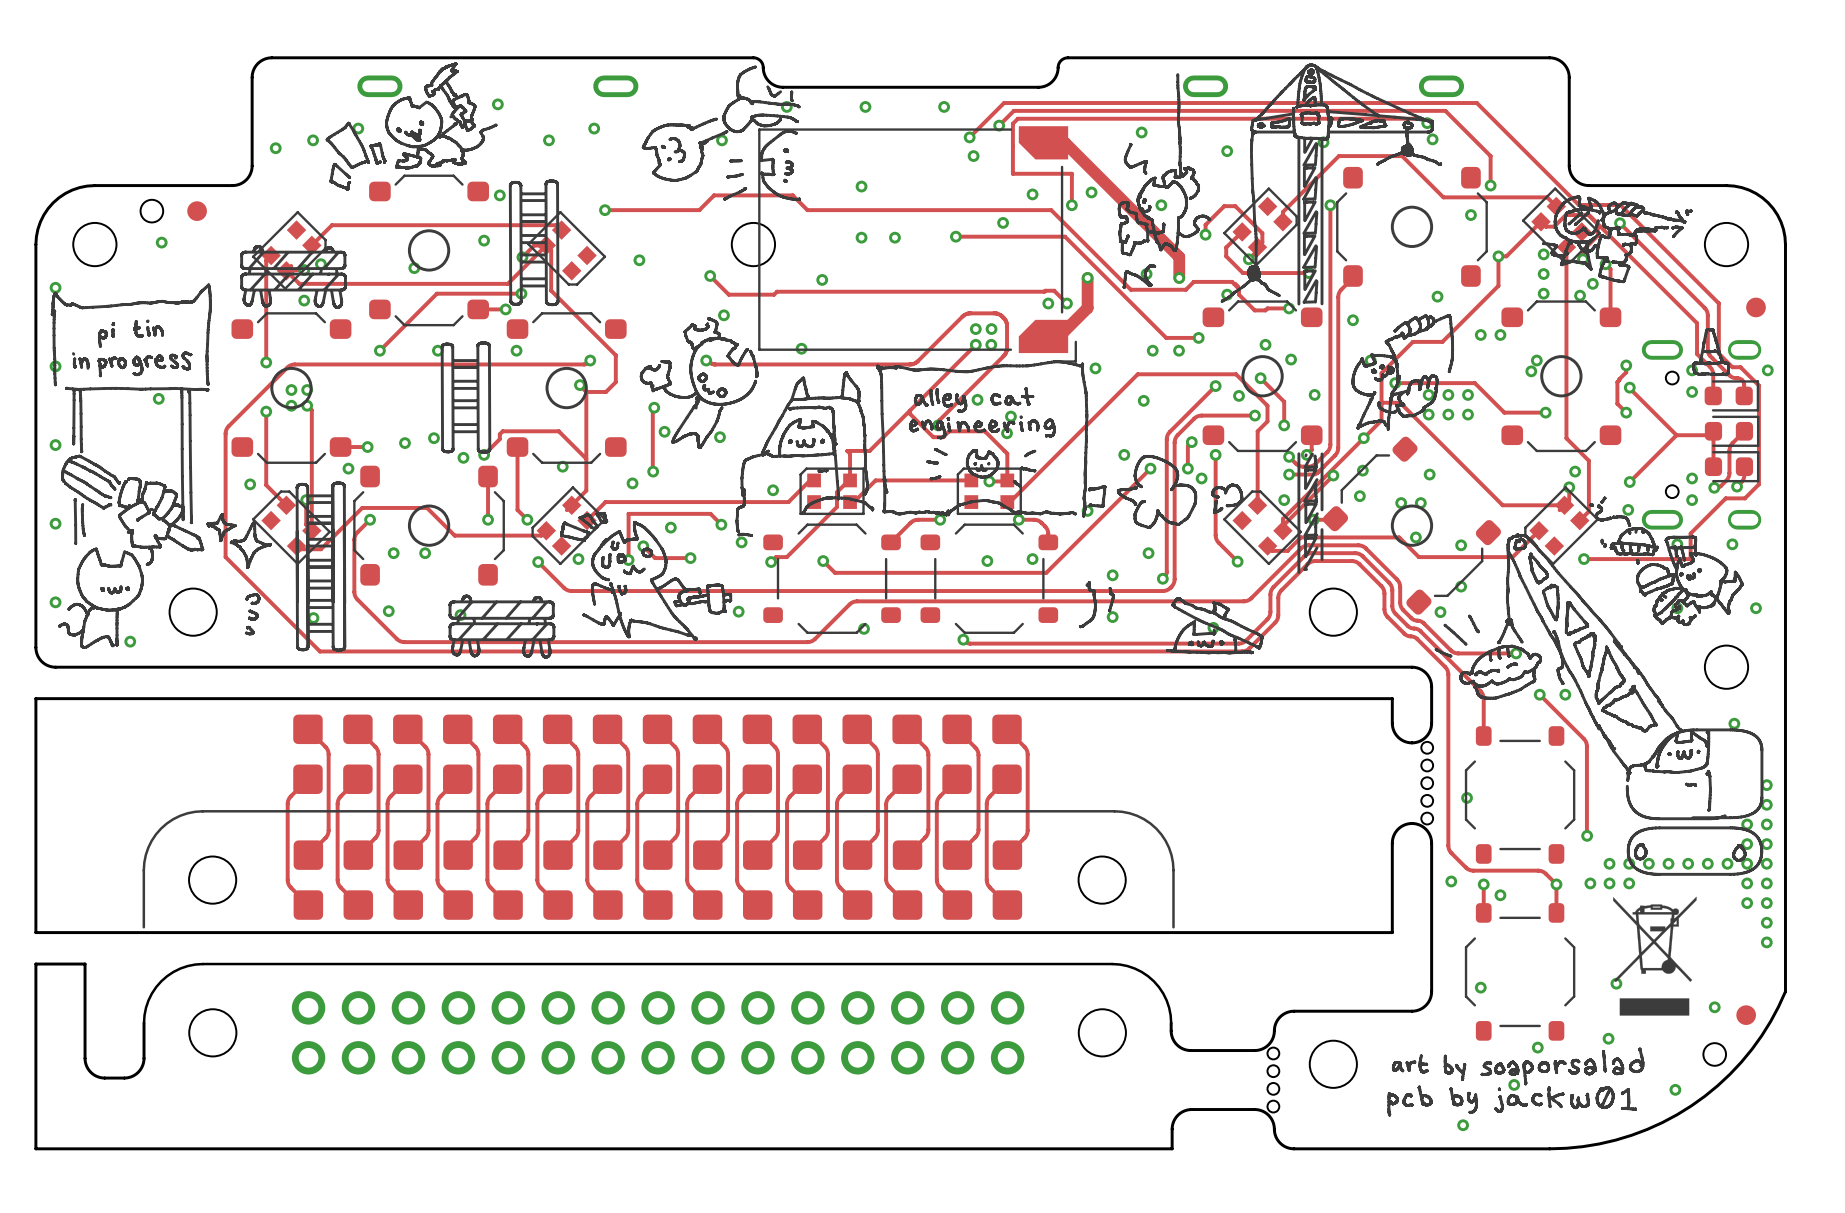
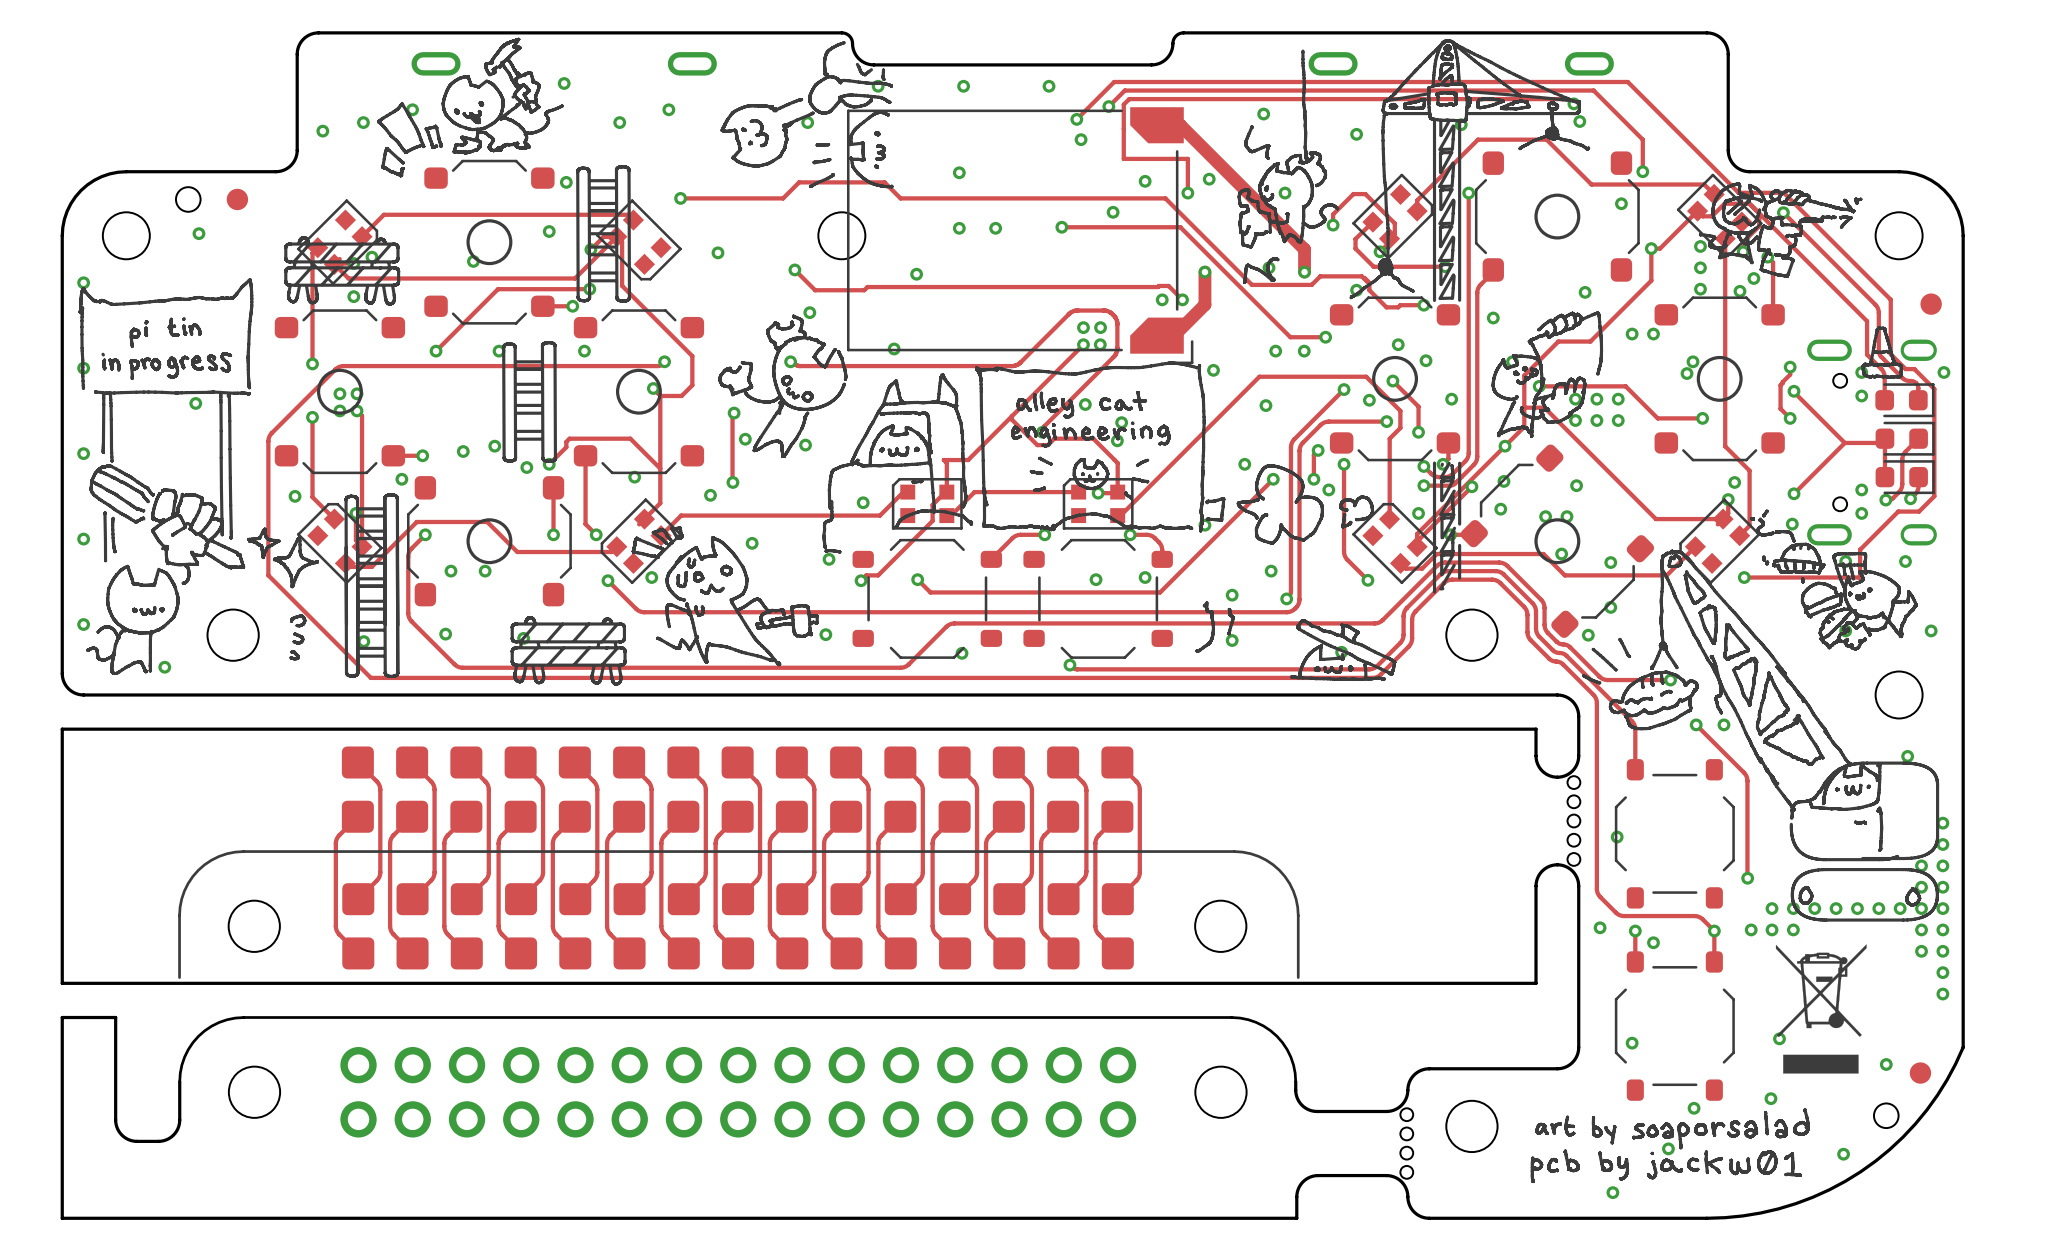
track: (721, 524) (710, 513) (628, 513) (628, 560) -> none
via: (721, 524) -> none
track: (643, 546) (655, 558) (690, 558) -> none
via: (643, 546) -> none
via: (690, 558) -> none
via: (628, 560) -> none

